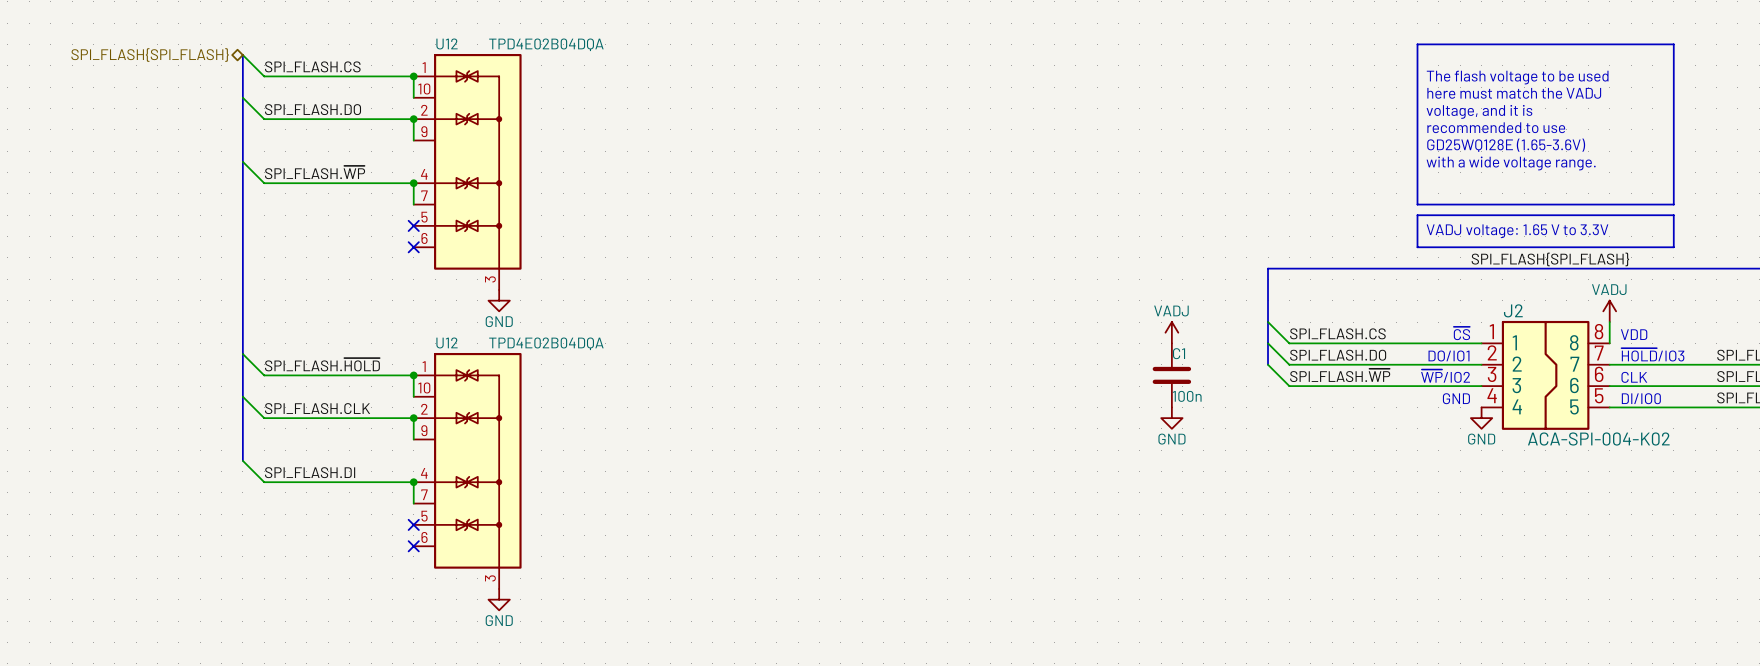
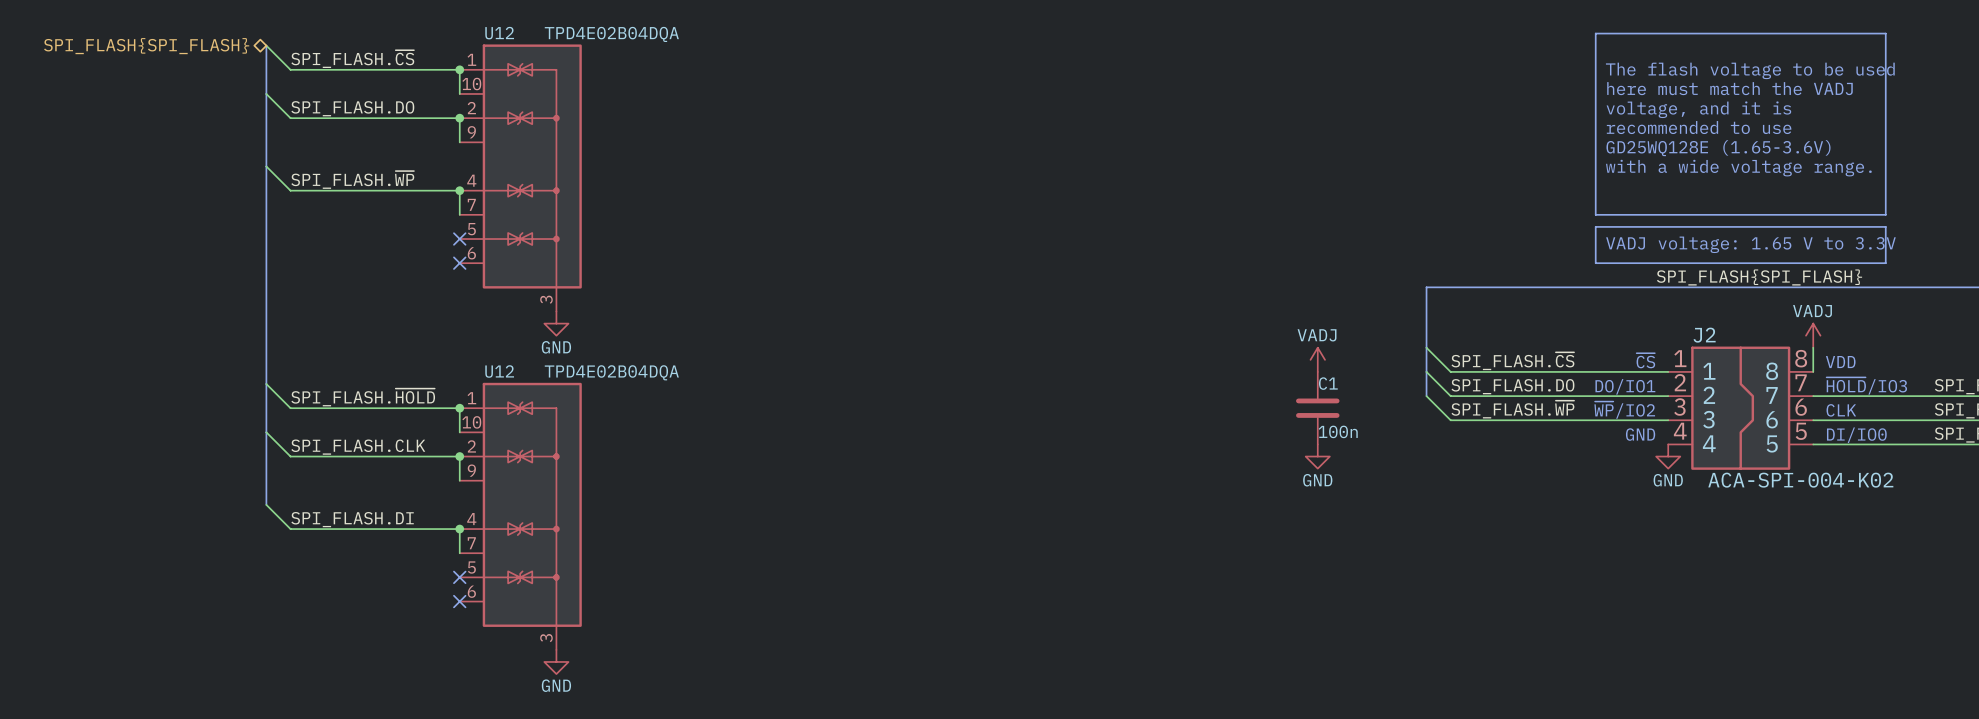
label: SPI_FLASH.CS (312, 66) -> SPI_FLASH.~{CS} (352, 59)
label: SPI_FLASH.CS (1337, 333) -> SPI_FLASH.~{CS} (1512, 361)

